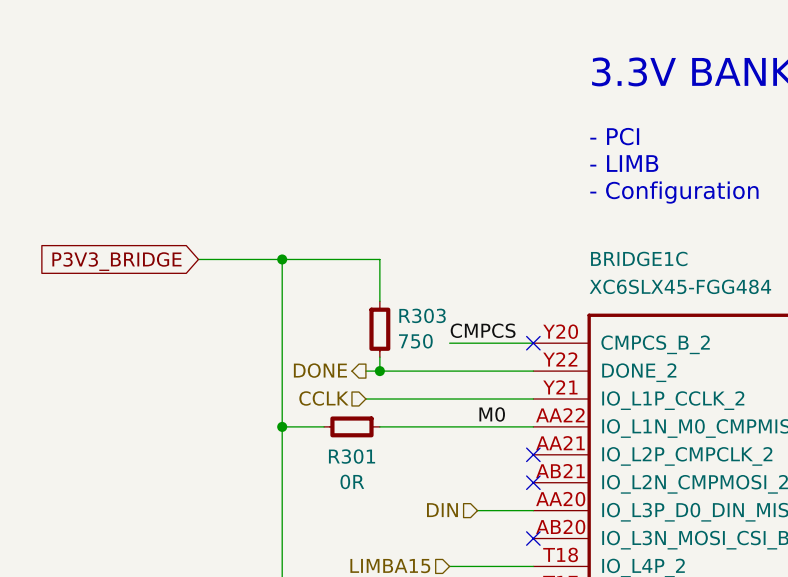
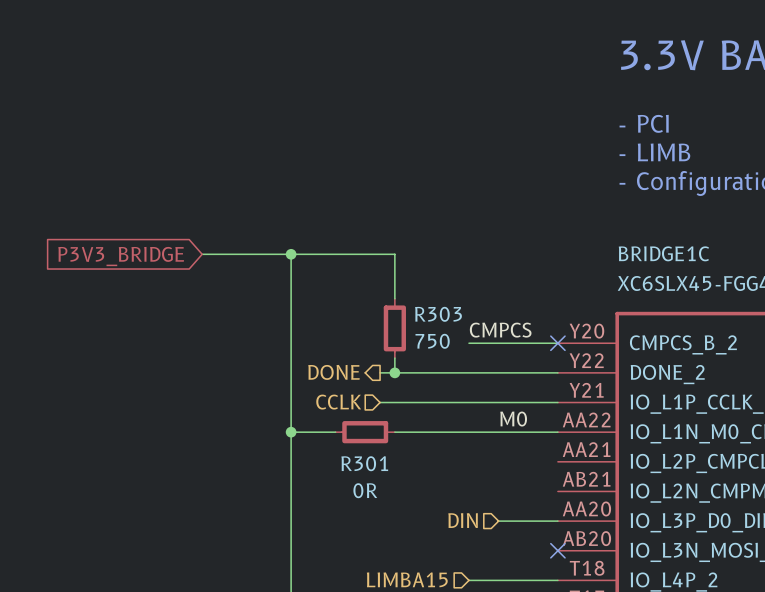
no-connect mark: (533, 454) -> none
no-connect mark: (533, 482) -> none

